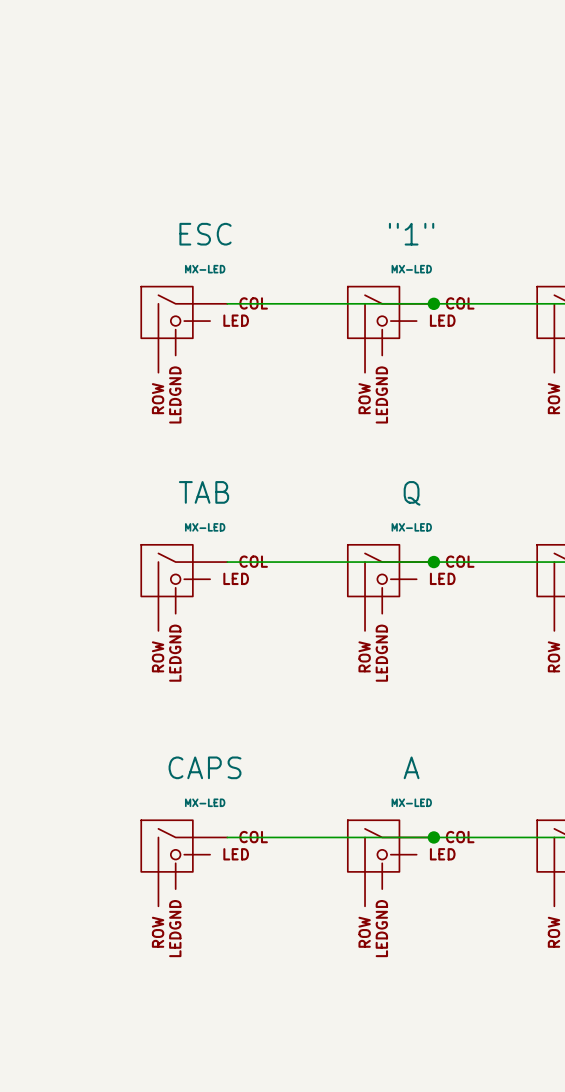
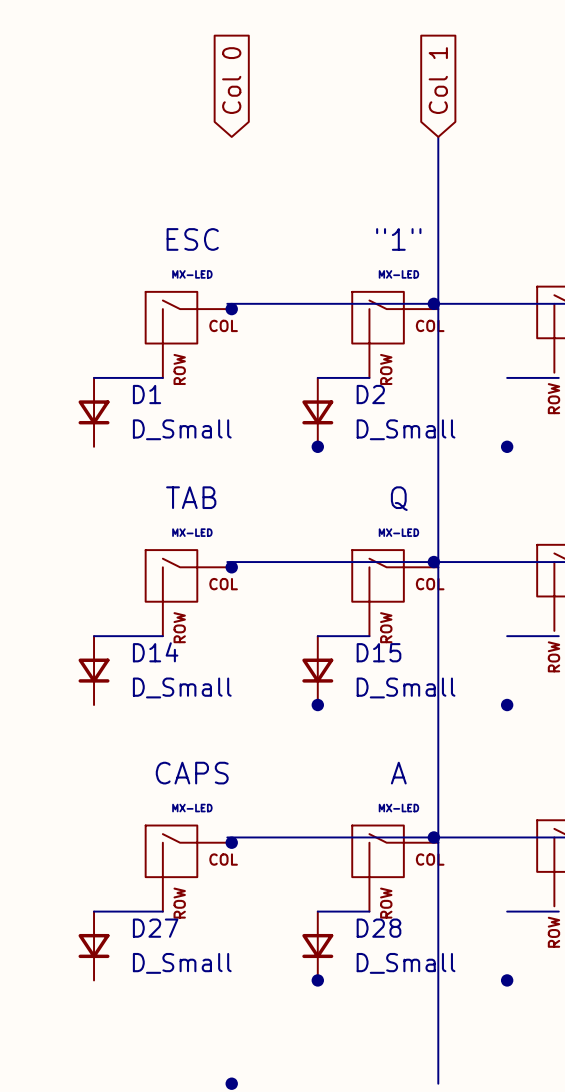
global label: none -> Col 0 (231, 80)
global label: none -> Col 1 (438, 80)
wire: none -> (438, 136) (438, 1083)
ESC symbol: [141, 286, 228, 373] -> [145, 291, 232, 378]
"1" symbol: [347, 286, 434, 373] -> [352, 291, 439, 378]
junction: none -> (231, 309)
wire: none -> (94, 377) (162, 377)
wire: none -> (317, 377) (369, 377)
wire: none -> (507, 377) (558, 377)
D1: none -> D_Small (94, 412)
D2: none -> D_Small (317, 412)
junction: none -> (317, 446)
junction: none -> (507, 446)
TAB symbol: [141, 544, 228, 631] -> [145, 550, 232, 637]
Q symbol: [347, 544, 434, 631] -> [352, 550, 439, 637]
junction: none -> (231, 567)
wire: none -> (94, 636) (162, 636)
wire: none -> (317, 636) (369, 636)
wire: none -> (507, 636) (558, 636)
D14: none -> D_Small (94, 670)
D15: none -> D_Small (317, 670)
junction: none -> (317, 705)
junction: none -> (507, 705)
CAPS symbol: [141, 820, 228, 907] -> [145, 825, 232, 912]
A symbol: [347, 820, 434, 907] -> [352, 825, 439, 912]
junction: none -> (231, 842)
wire: none -> (94, 911) (162, 911)
wire: none -> (317, 911) (369, 911)
wire: none -> (507, 911) (558, 911)
D27: none -> D_Small (94, 946)
D28: none -> D_Small (317, 946)
junction: none -> (317, 980)
junction: none -> (507, 980)
junction: none -> (231, 1083)

